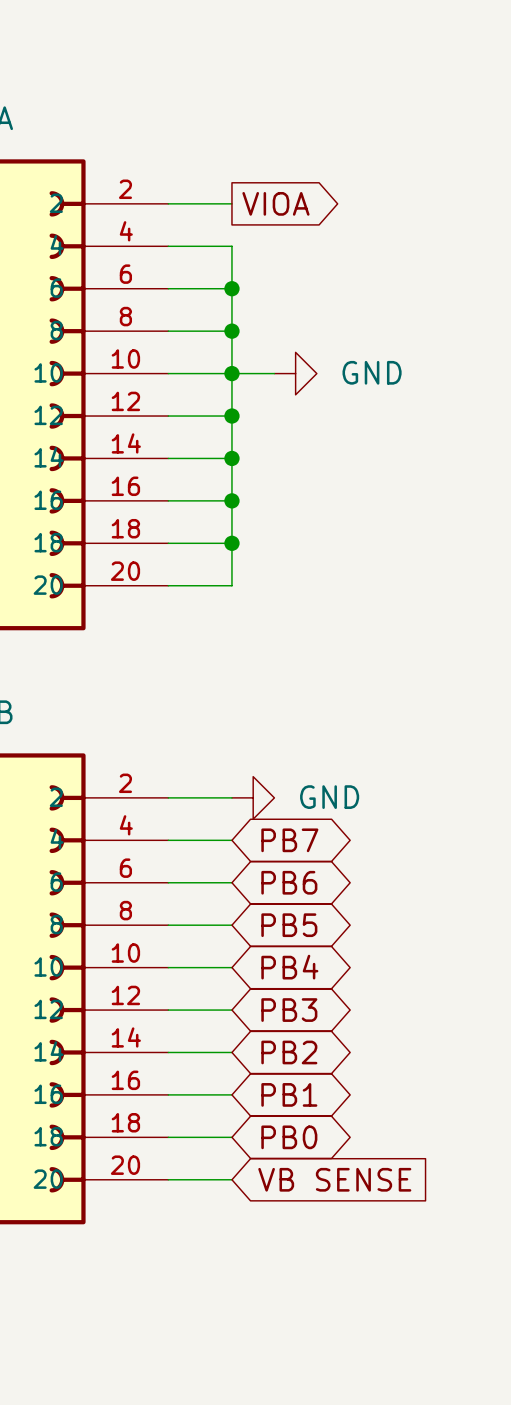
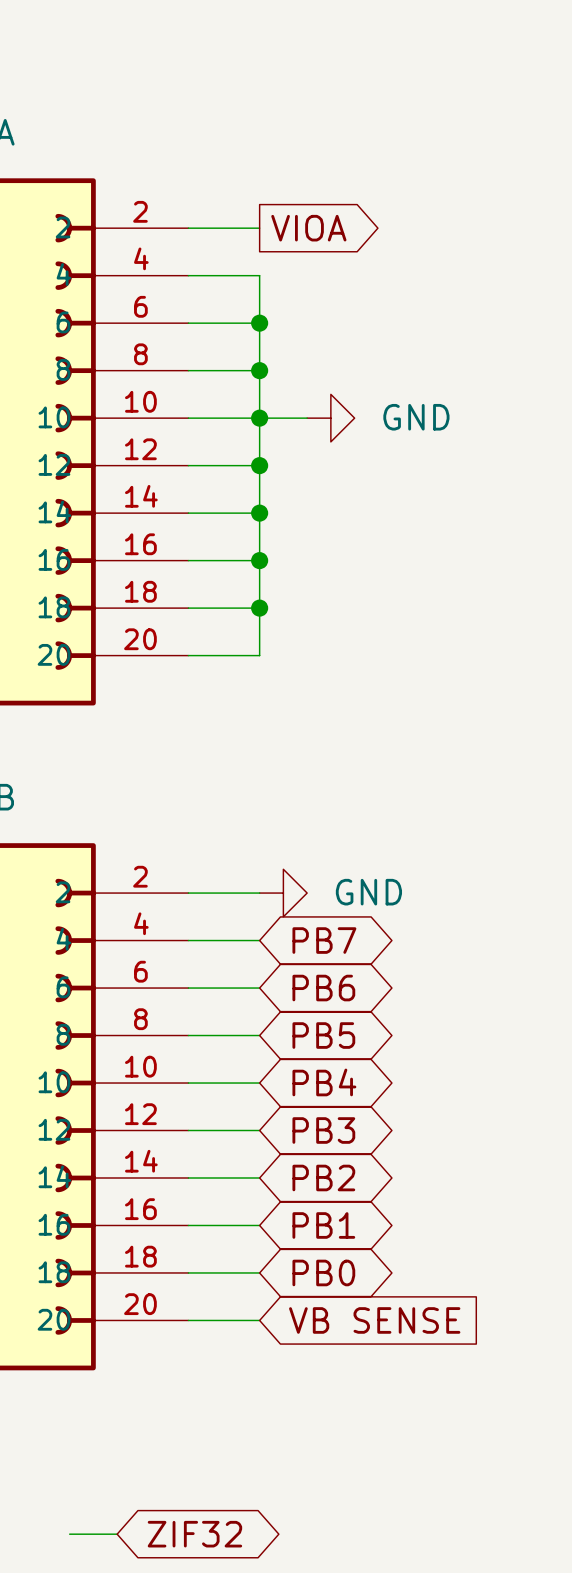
wire: none -> (69, 1534) (117, 1534)
global label: none -> ZIF32 (194, 1534)

